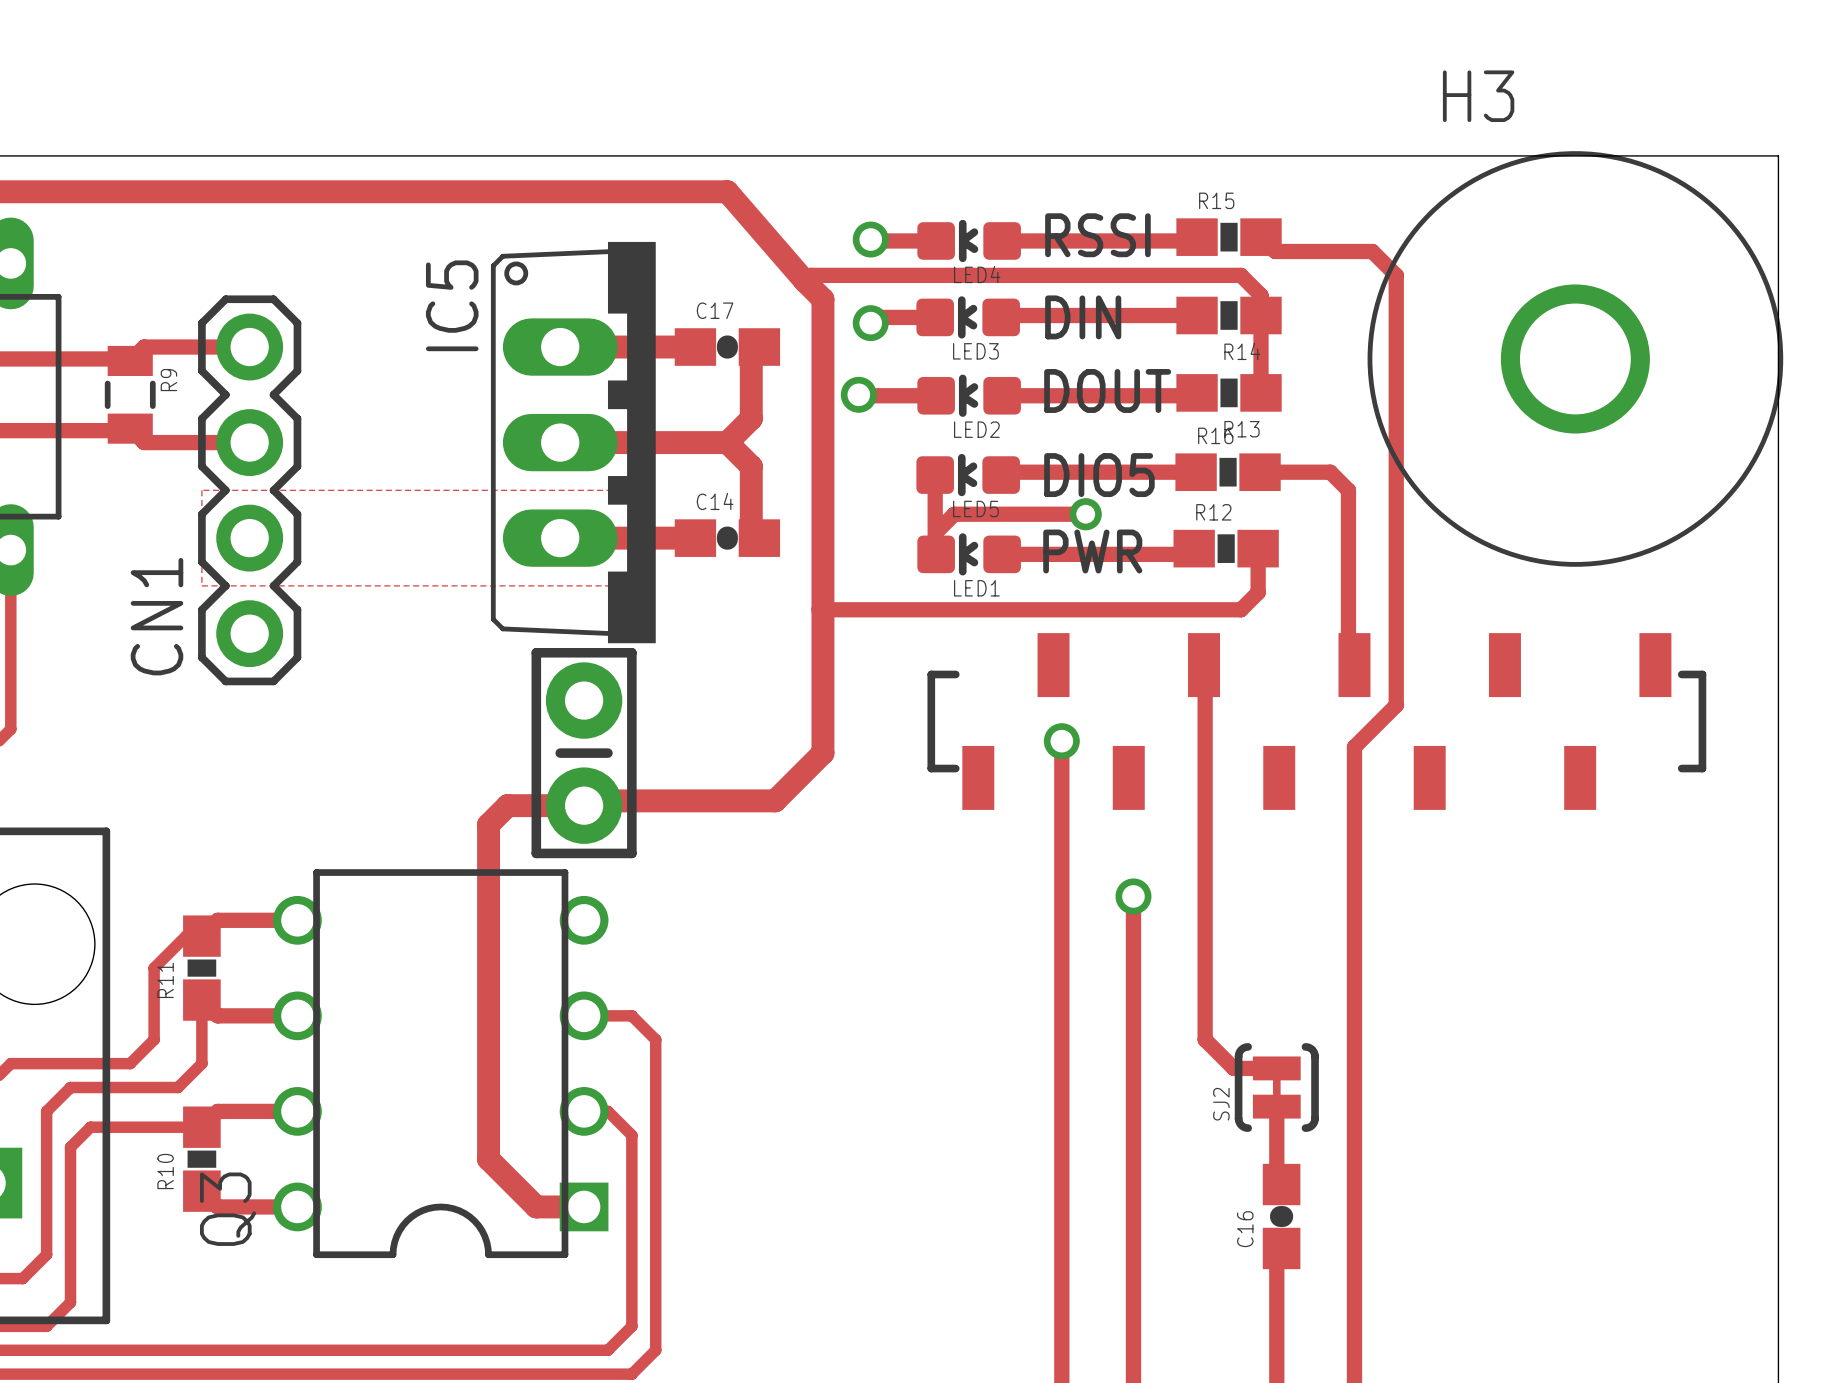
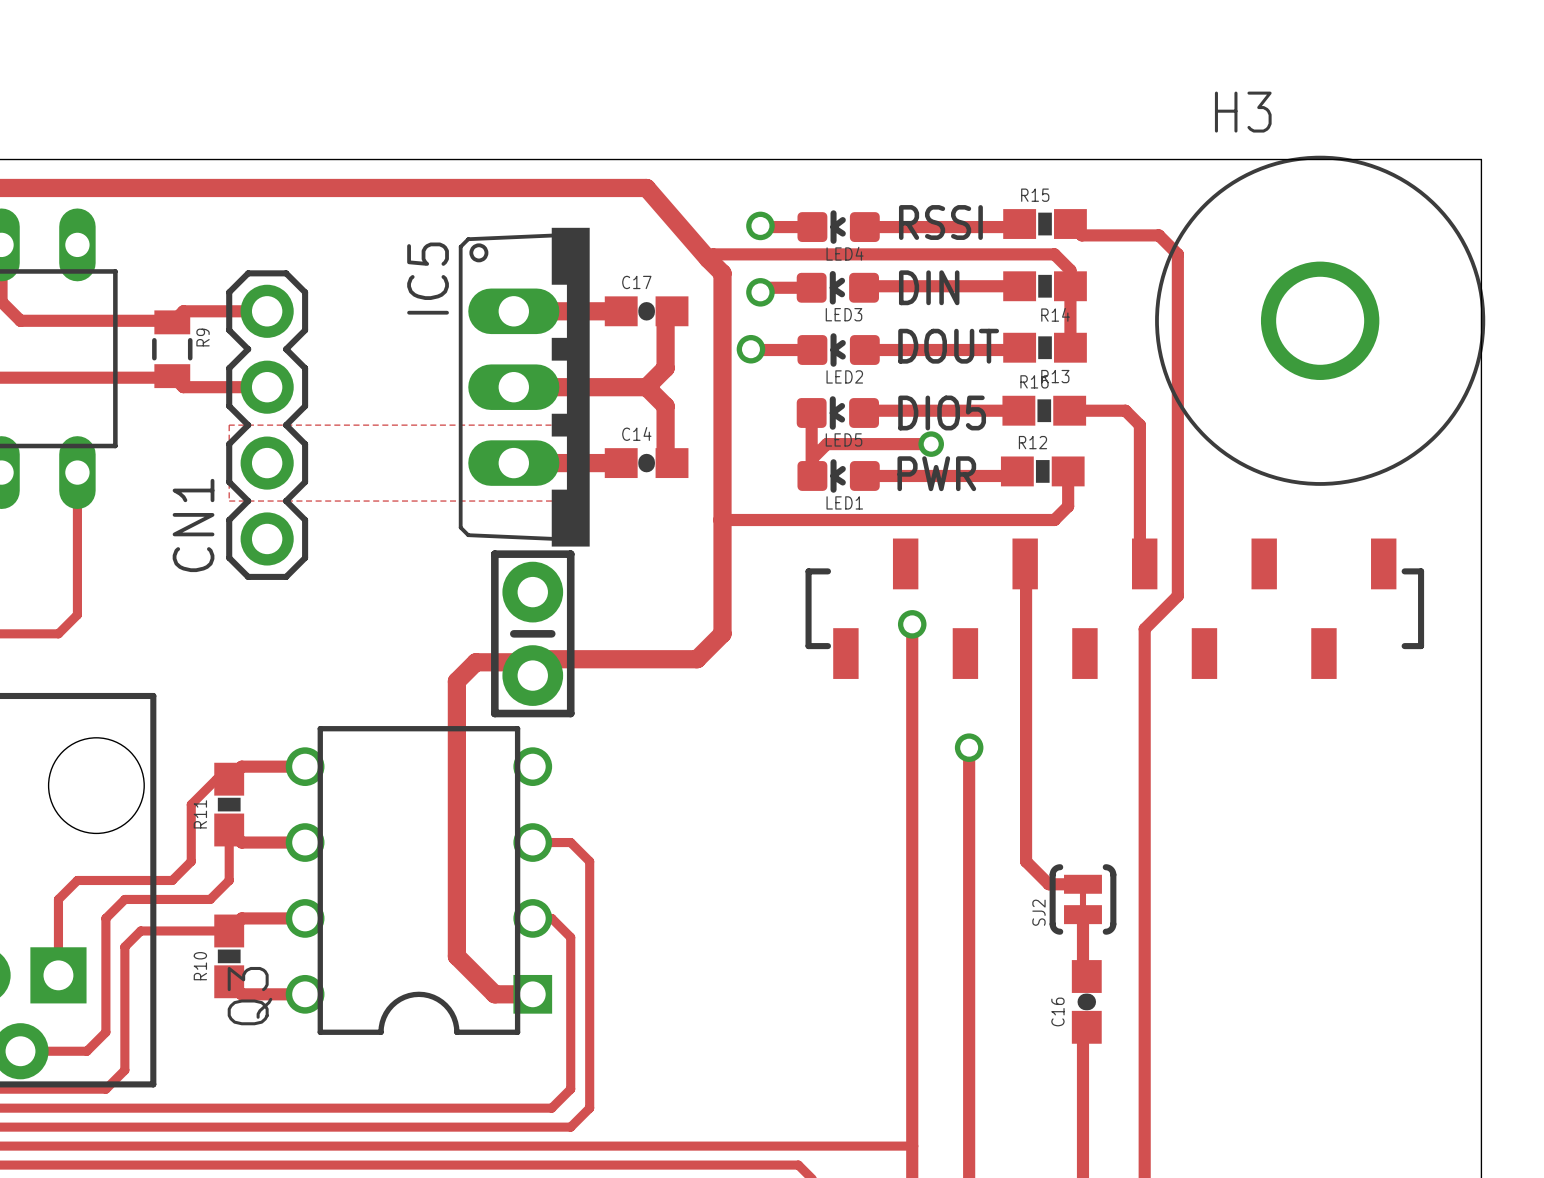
track: (790, 785) (775, 800) (588, 800) (584, 805) (507, 805) (488, 824) -> (697, 659) (532, 659) (529, 662) (475, 662) (456, 681) (456, 690)

